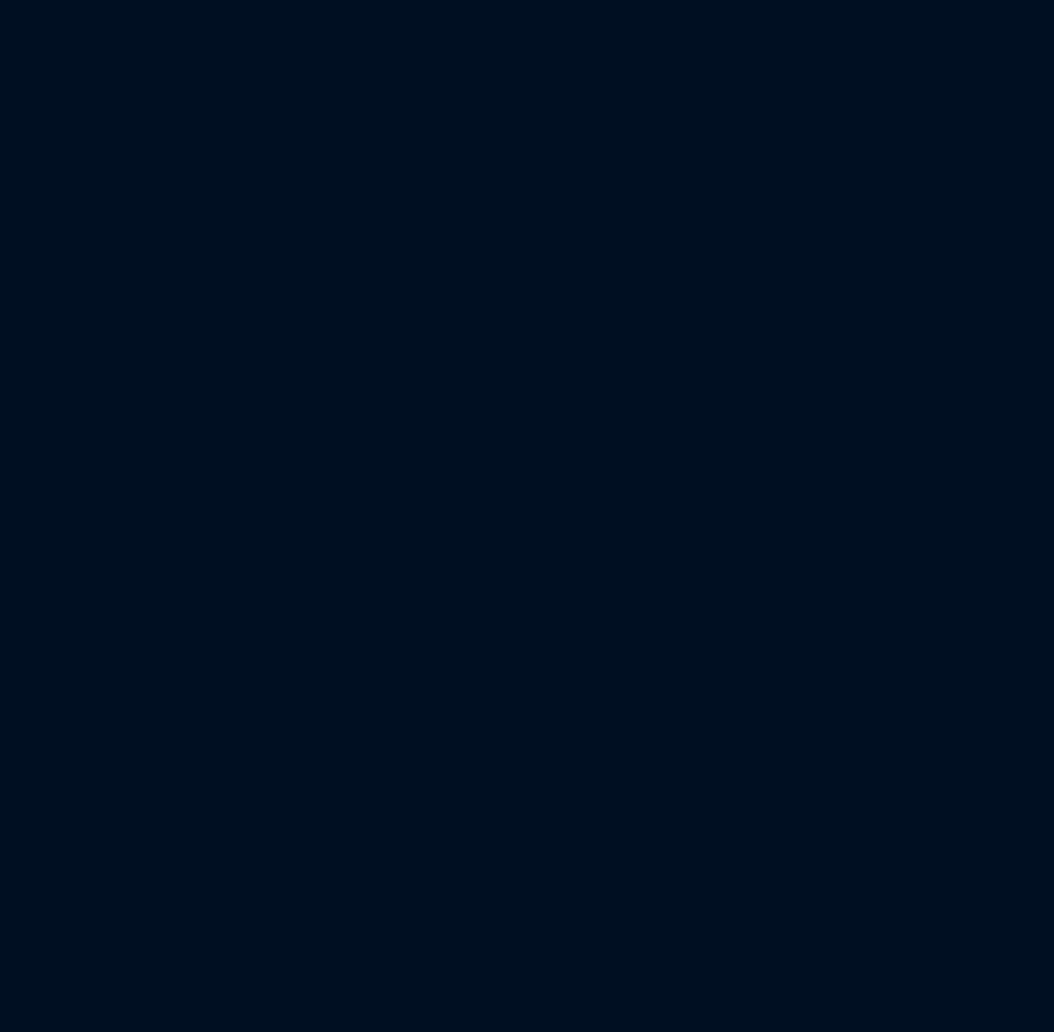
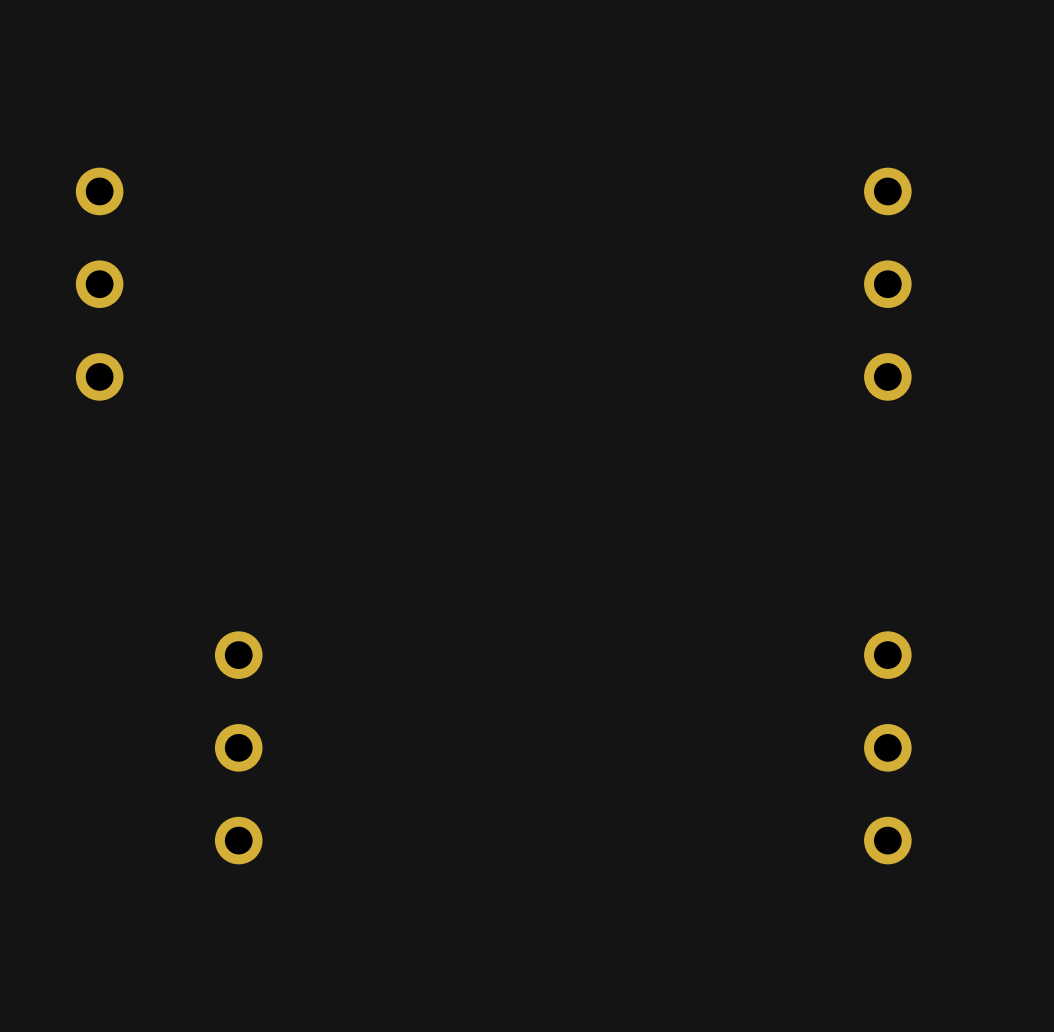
part: none -> (99, 284)
part: none -> (887, 284)
part: none -> (238, 747)
part: none -> (887, 747)

